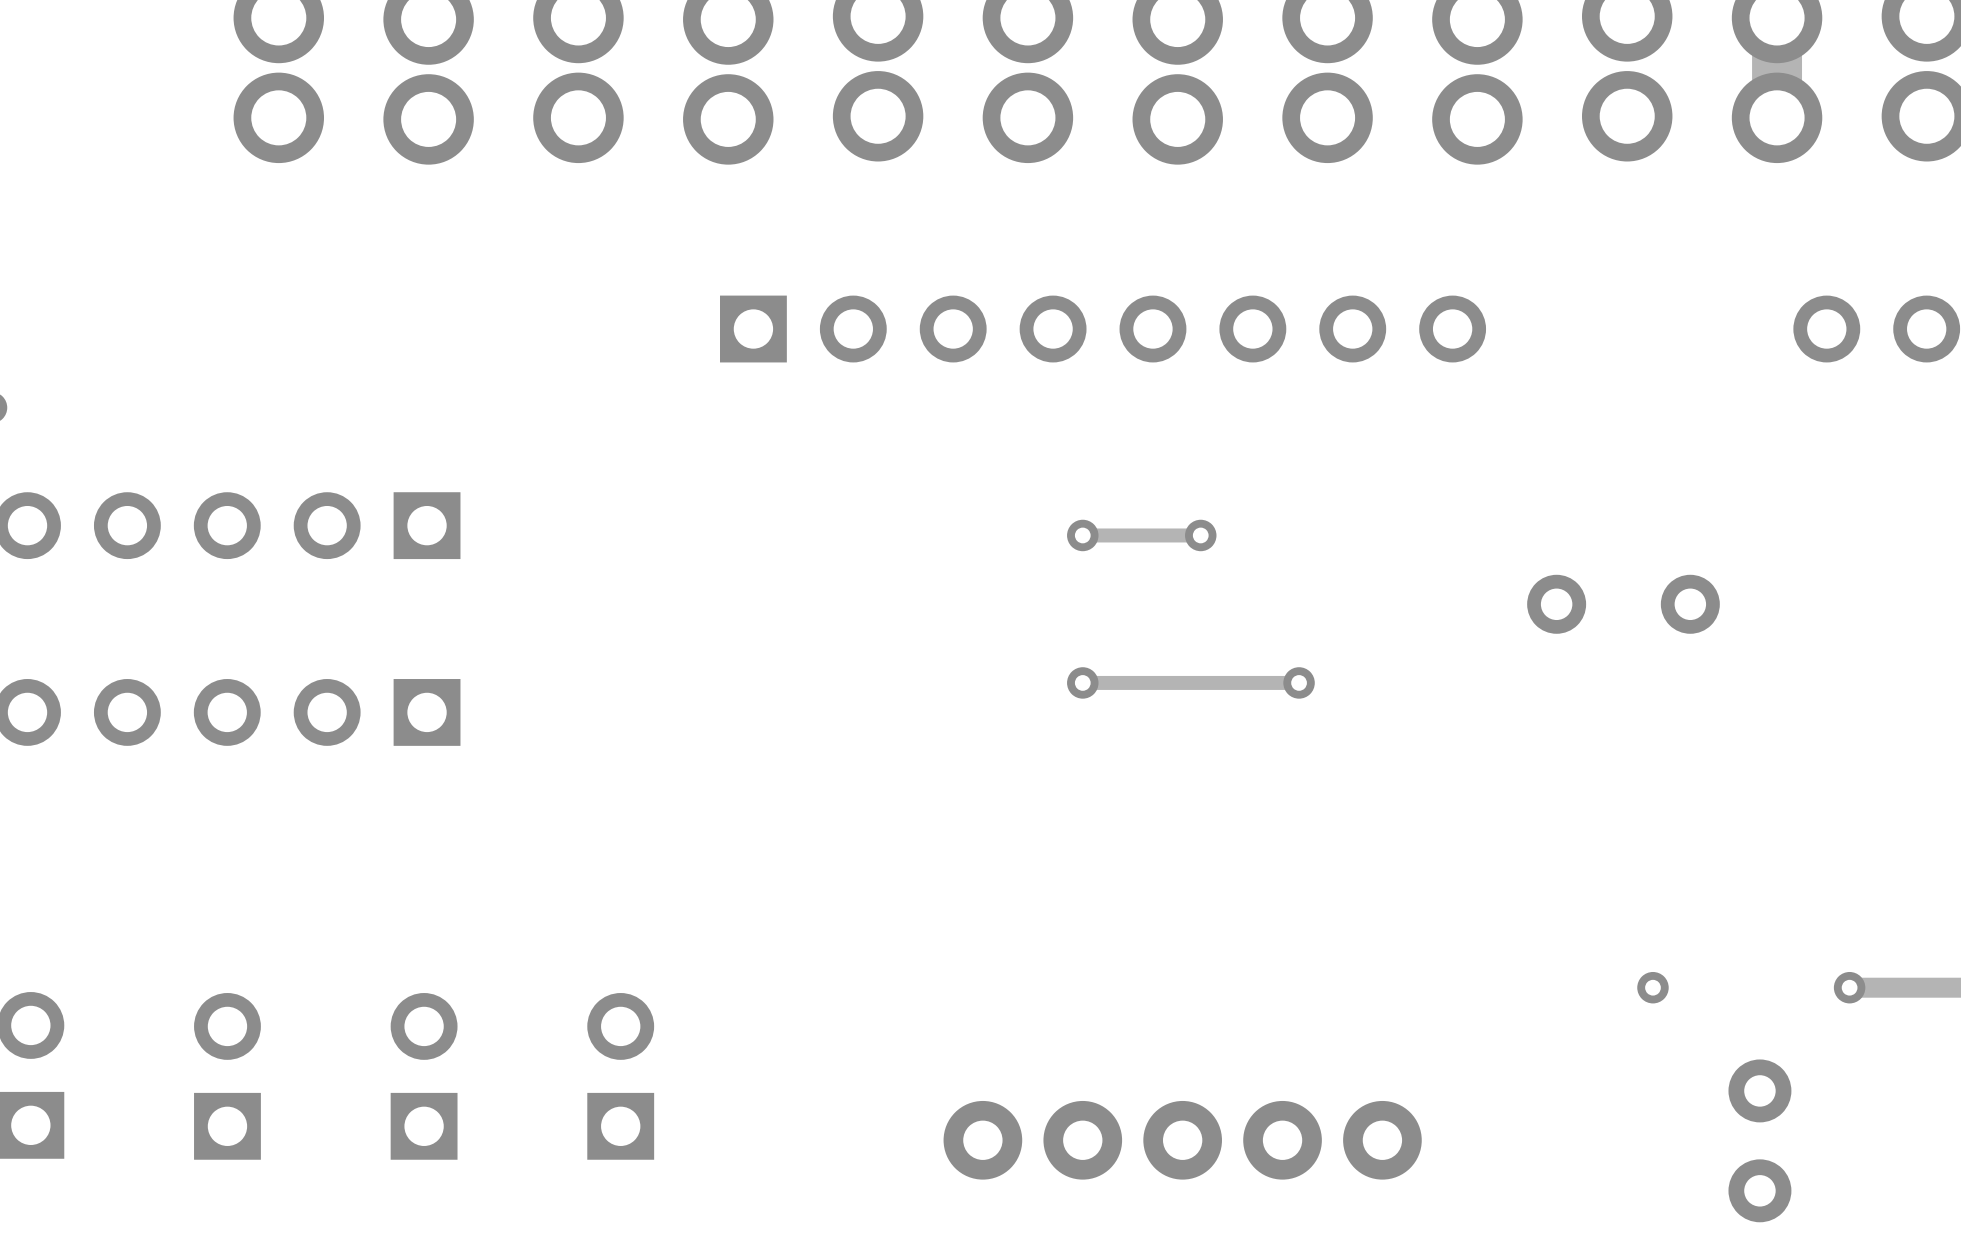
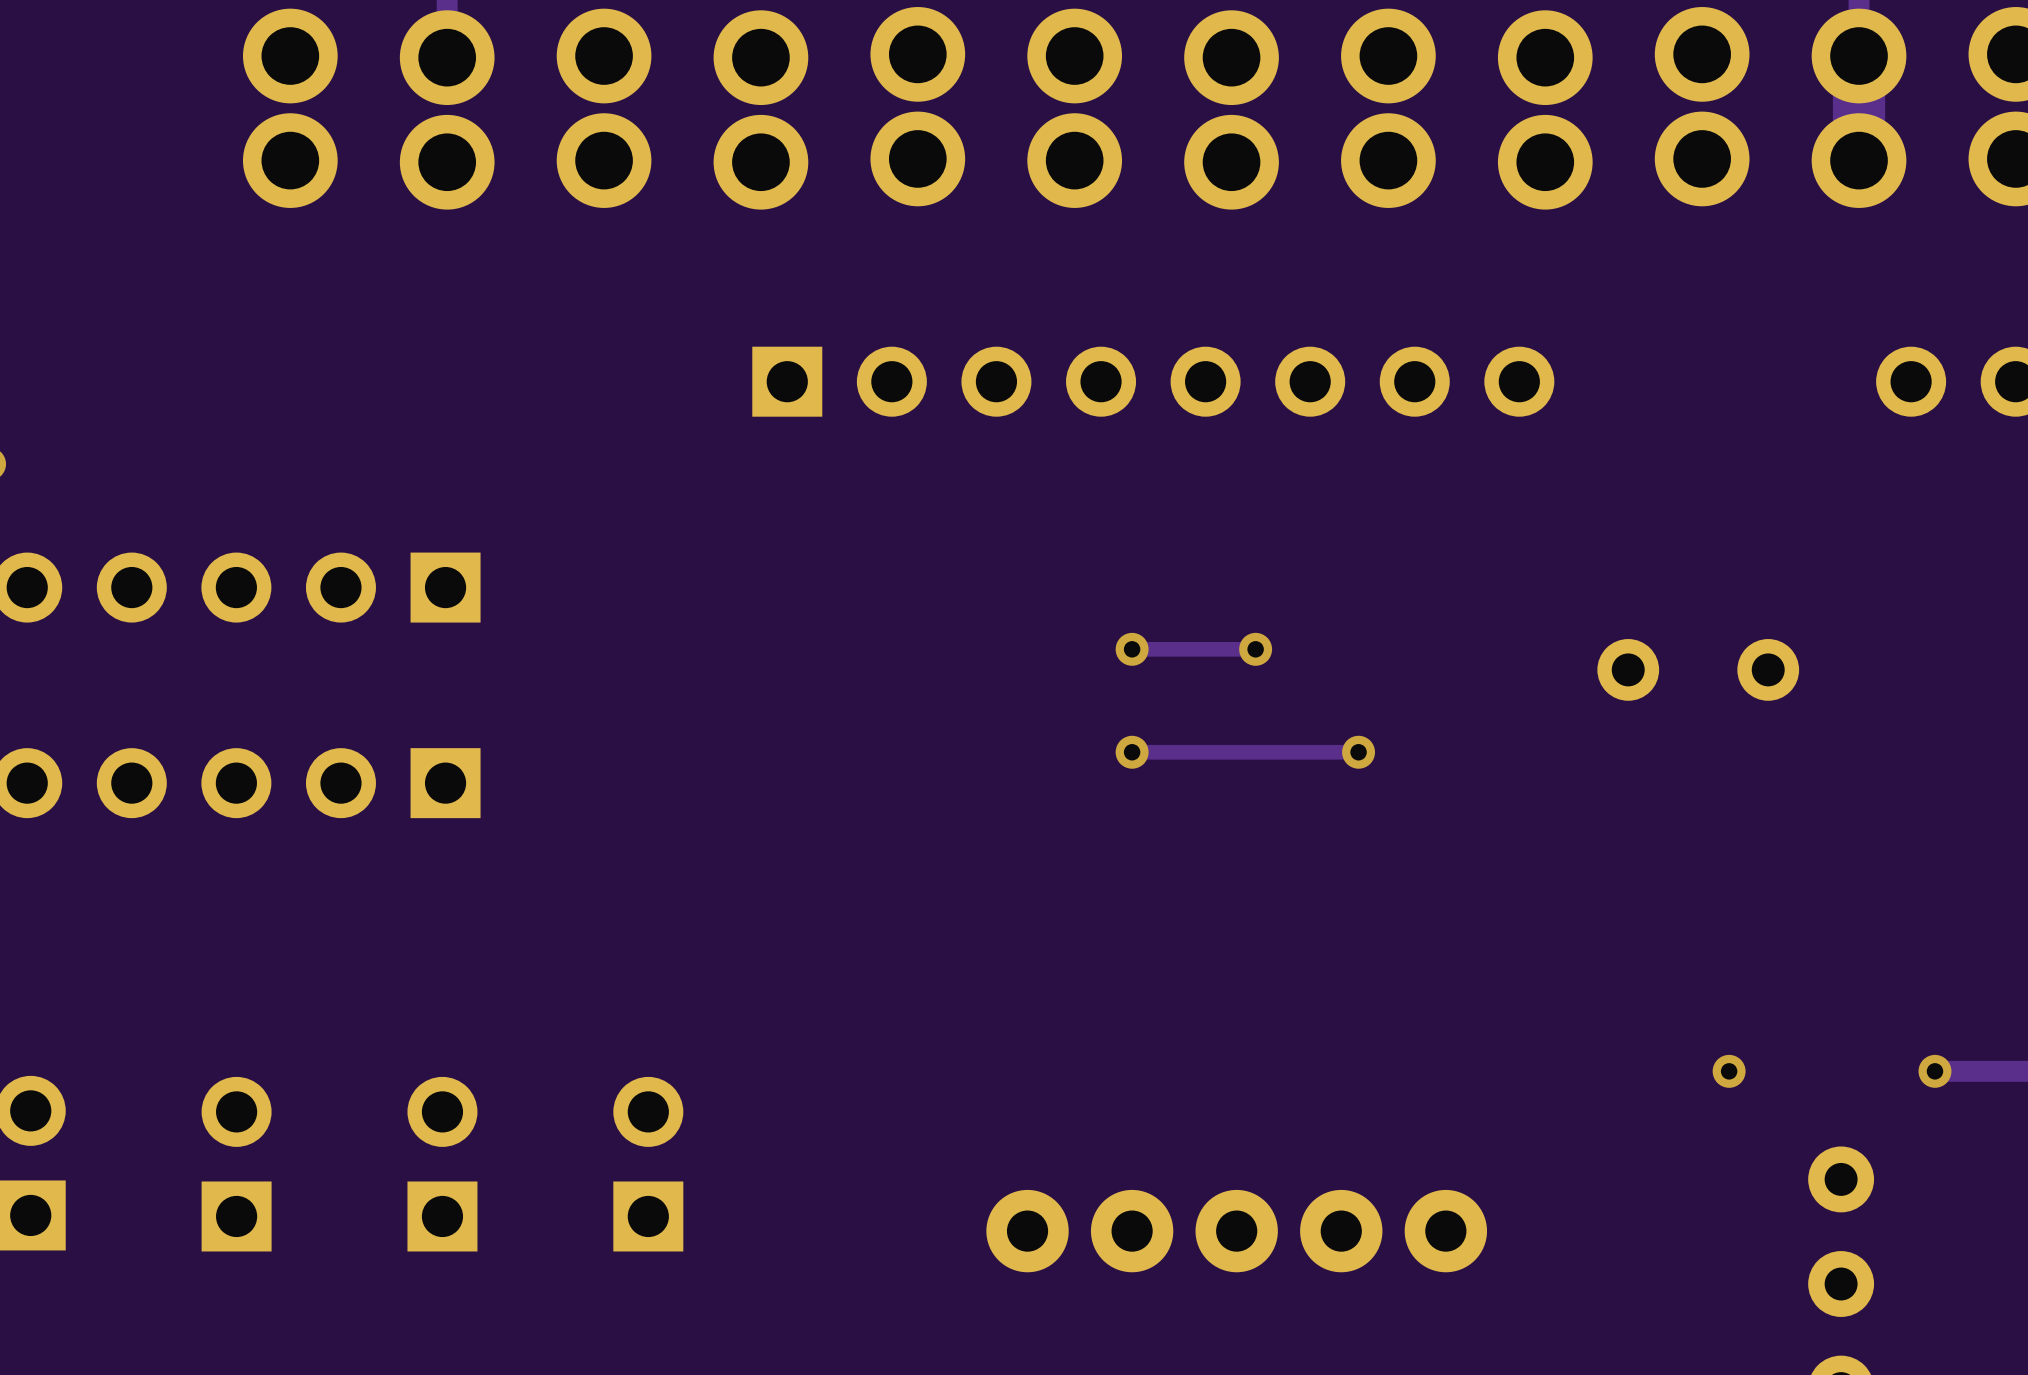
via position: (1082, 535) -> (1132, 649)
track: (1200, 535) (1082, 535) -> (1255, 649) (1132, 649)
via position: (1200, 535) -> (1255, 649)

